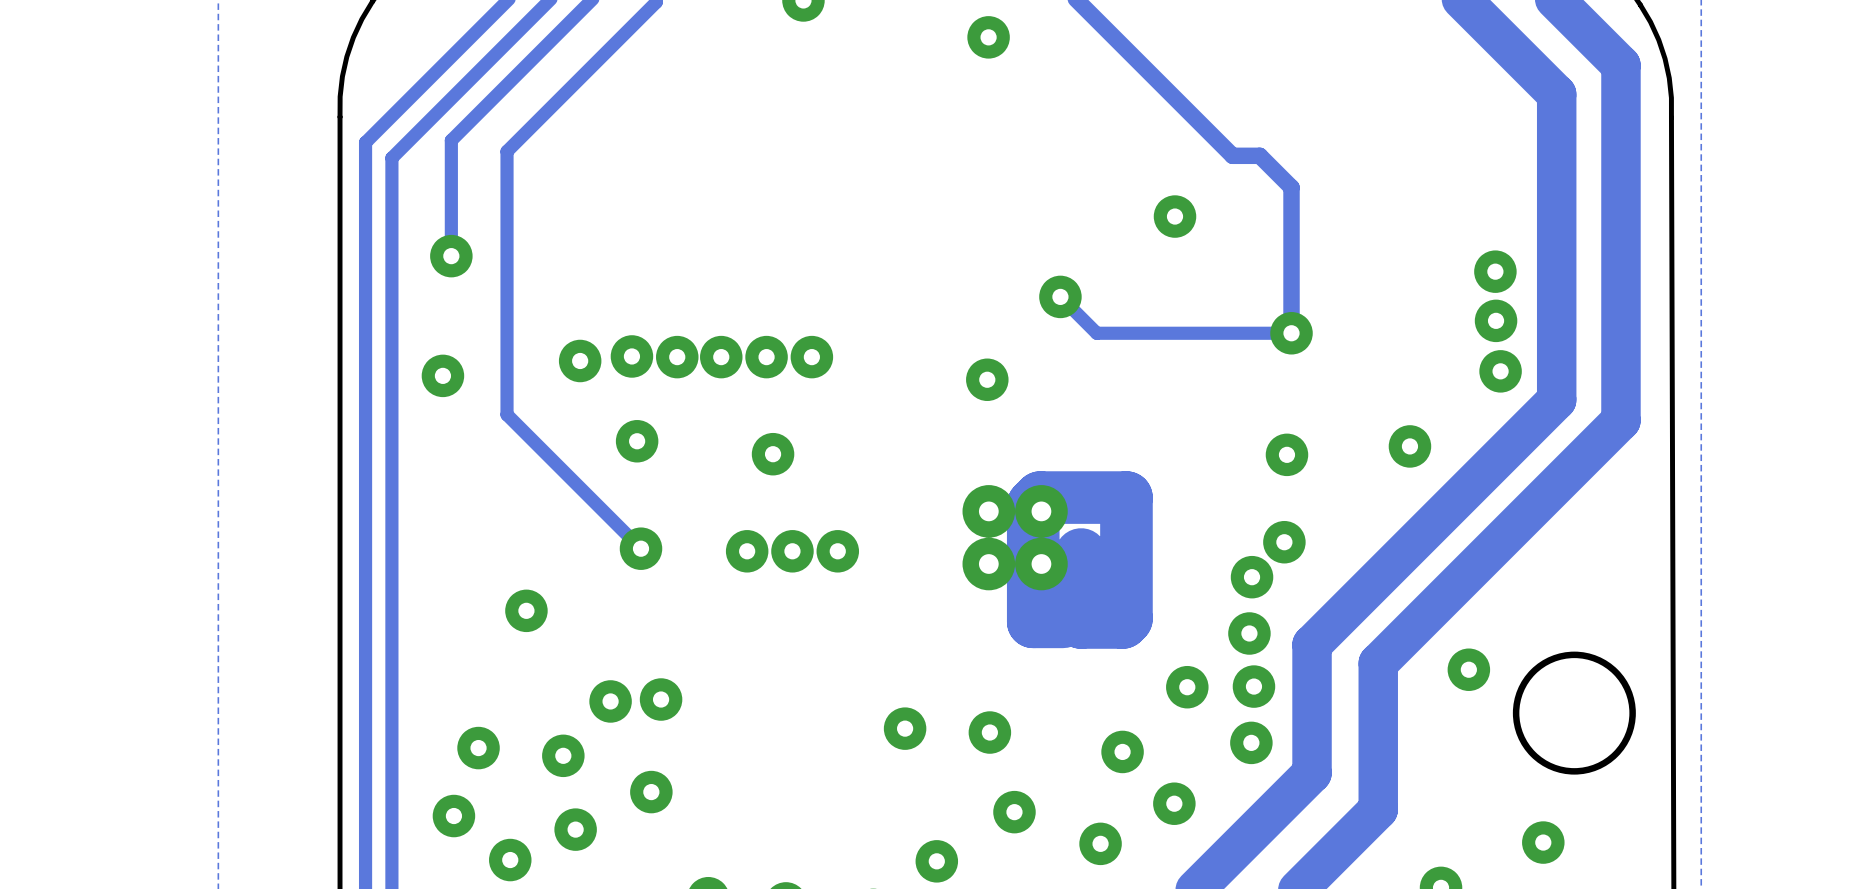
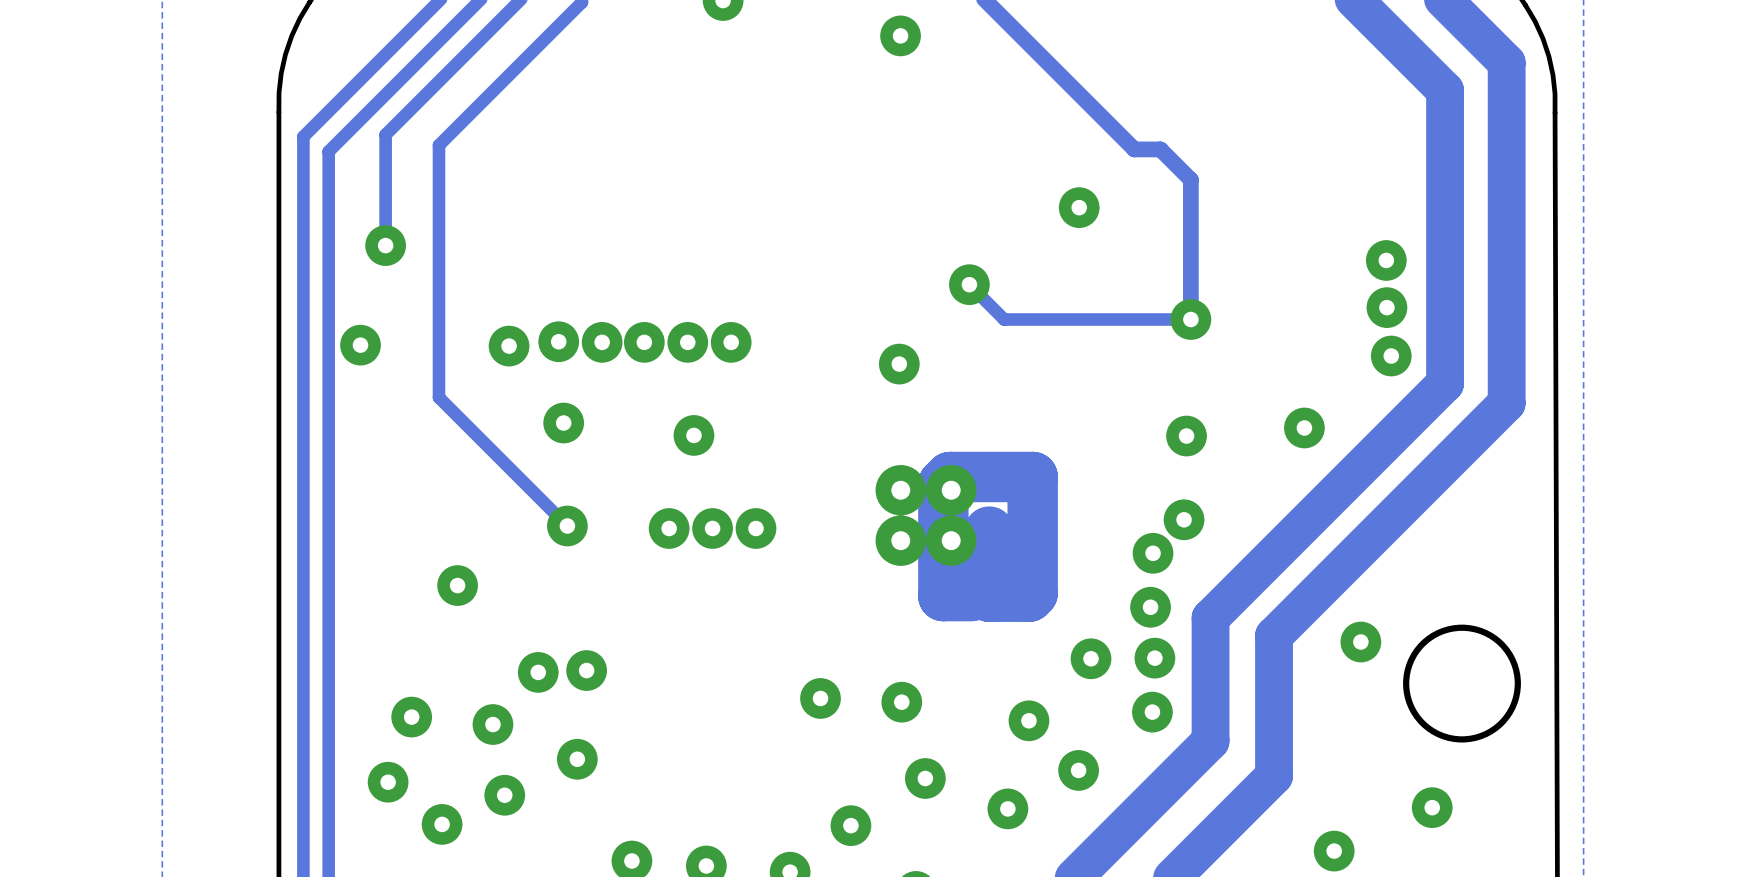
via position: (442, 375) -> (360, 345)

